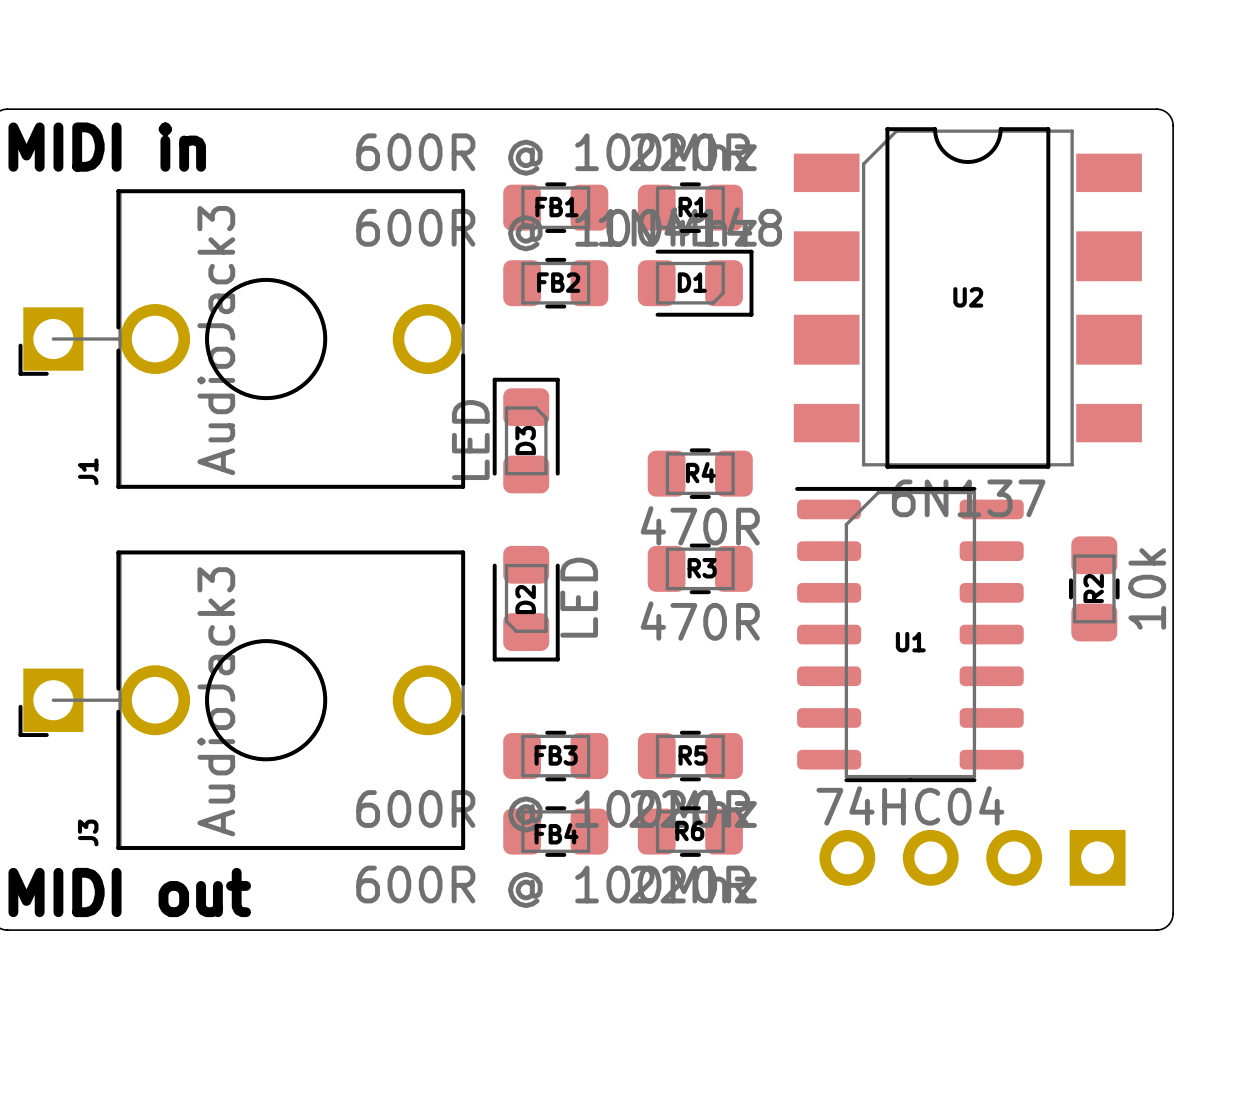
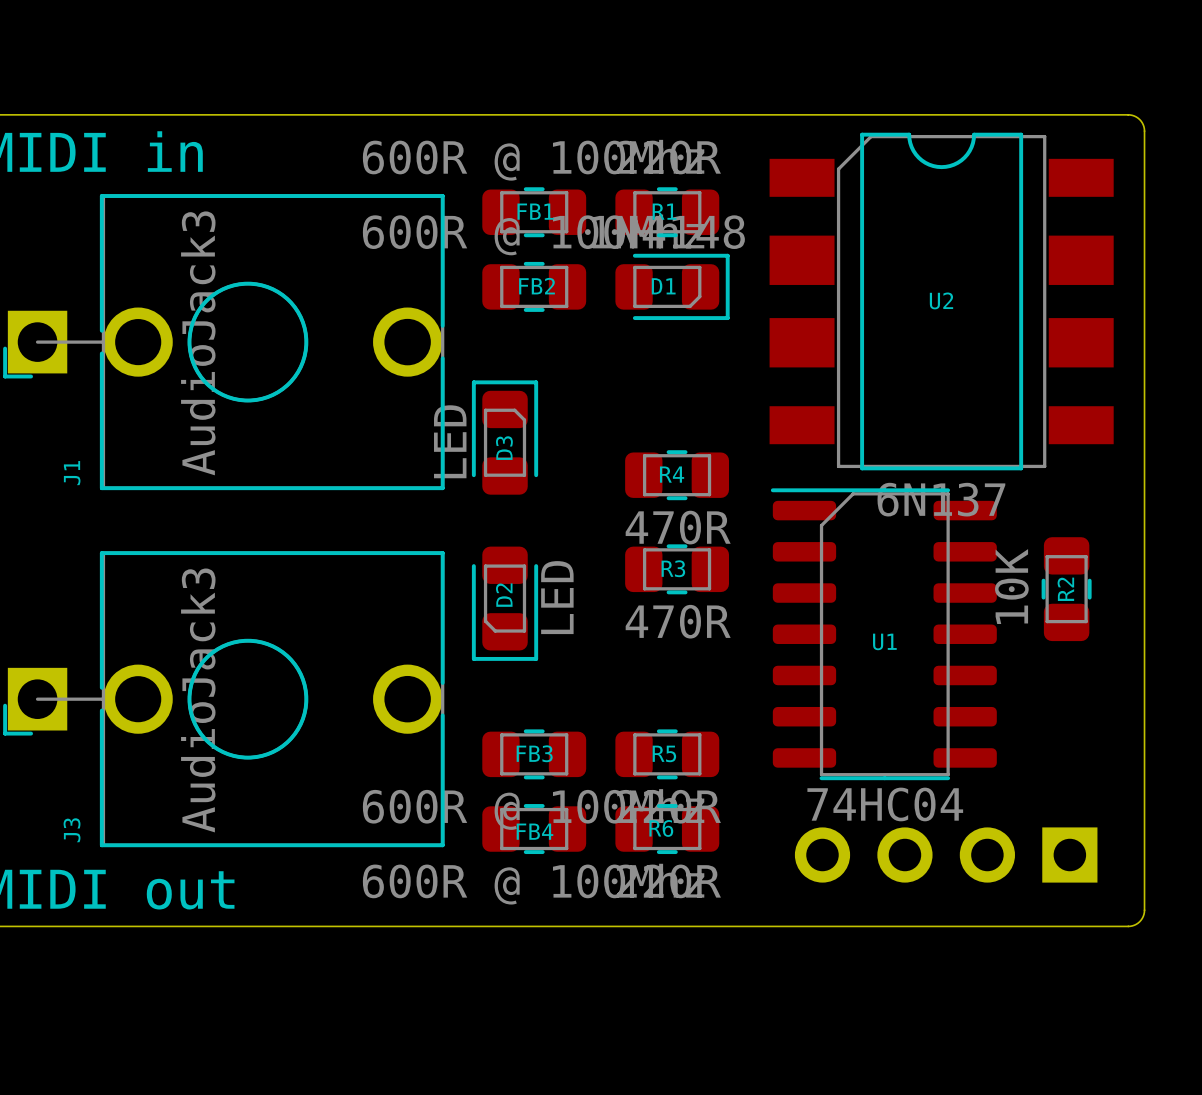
R2 value: 10k (1147, 588) -> 10K (1011, 586)

